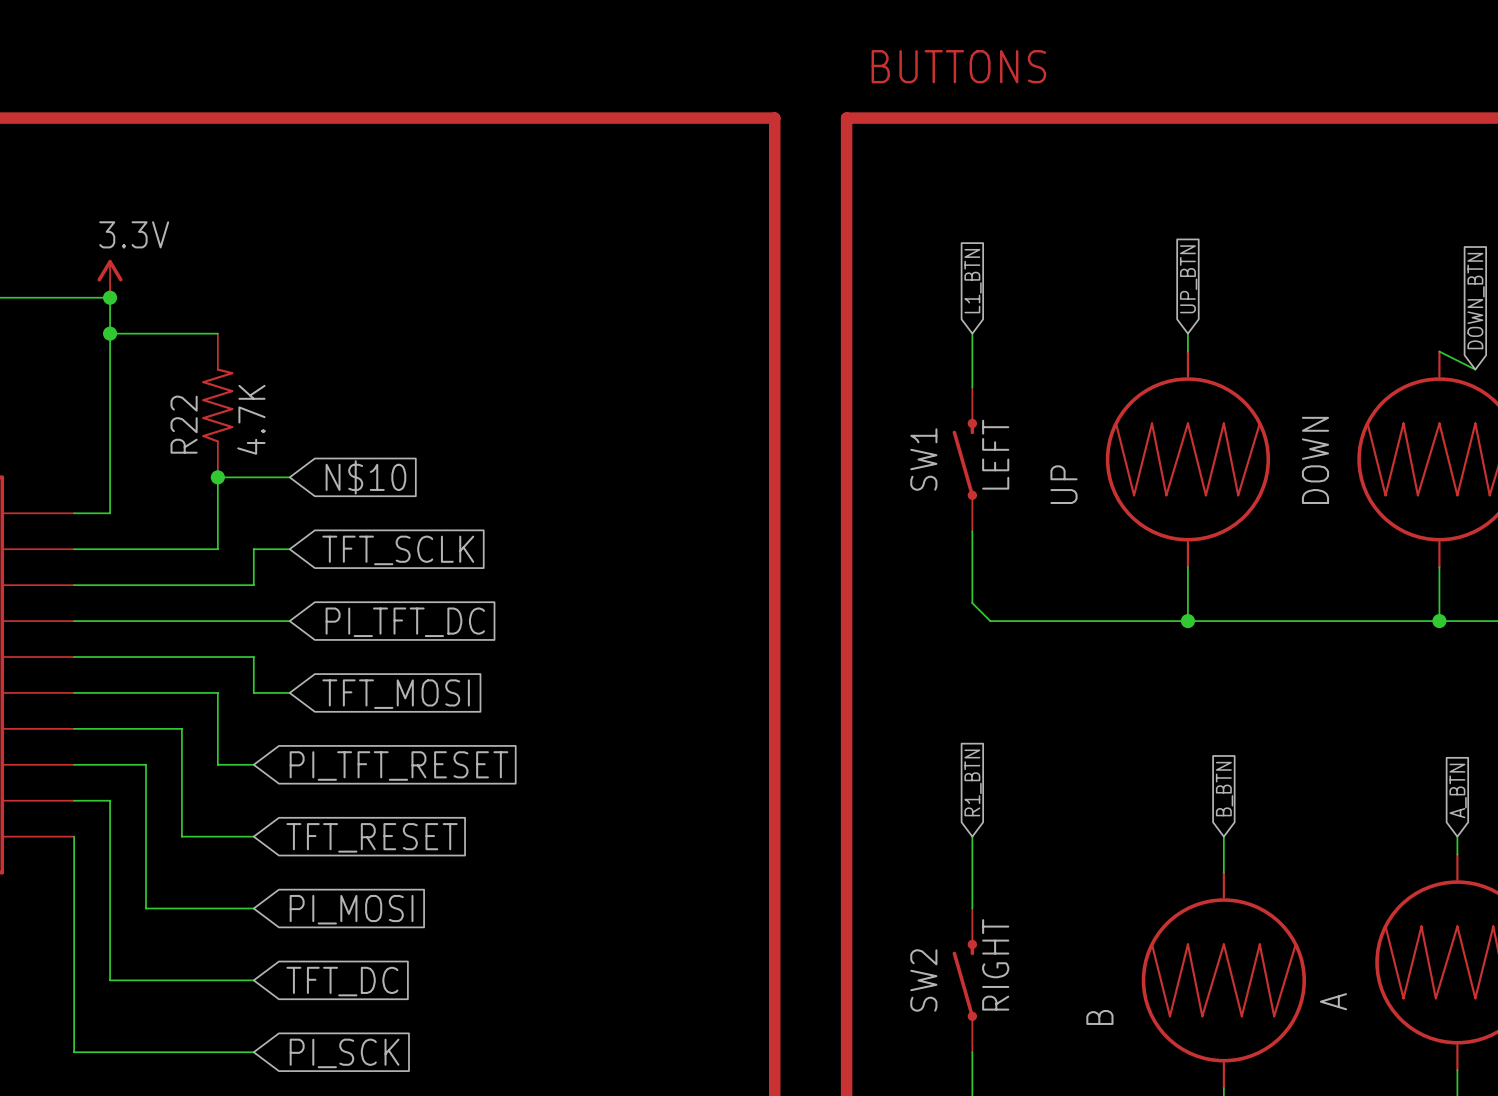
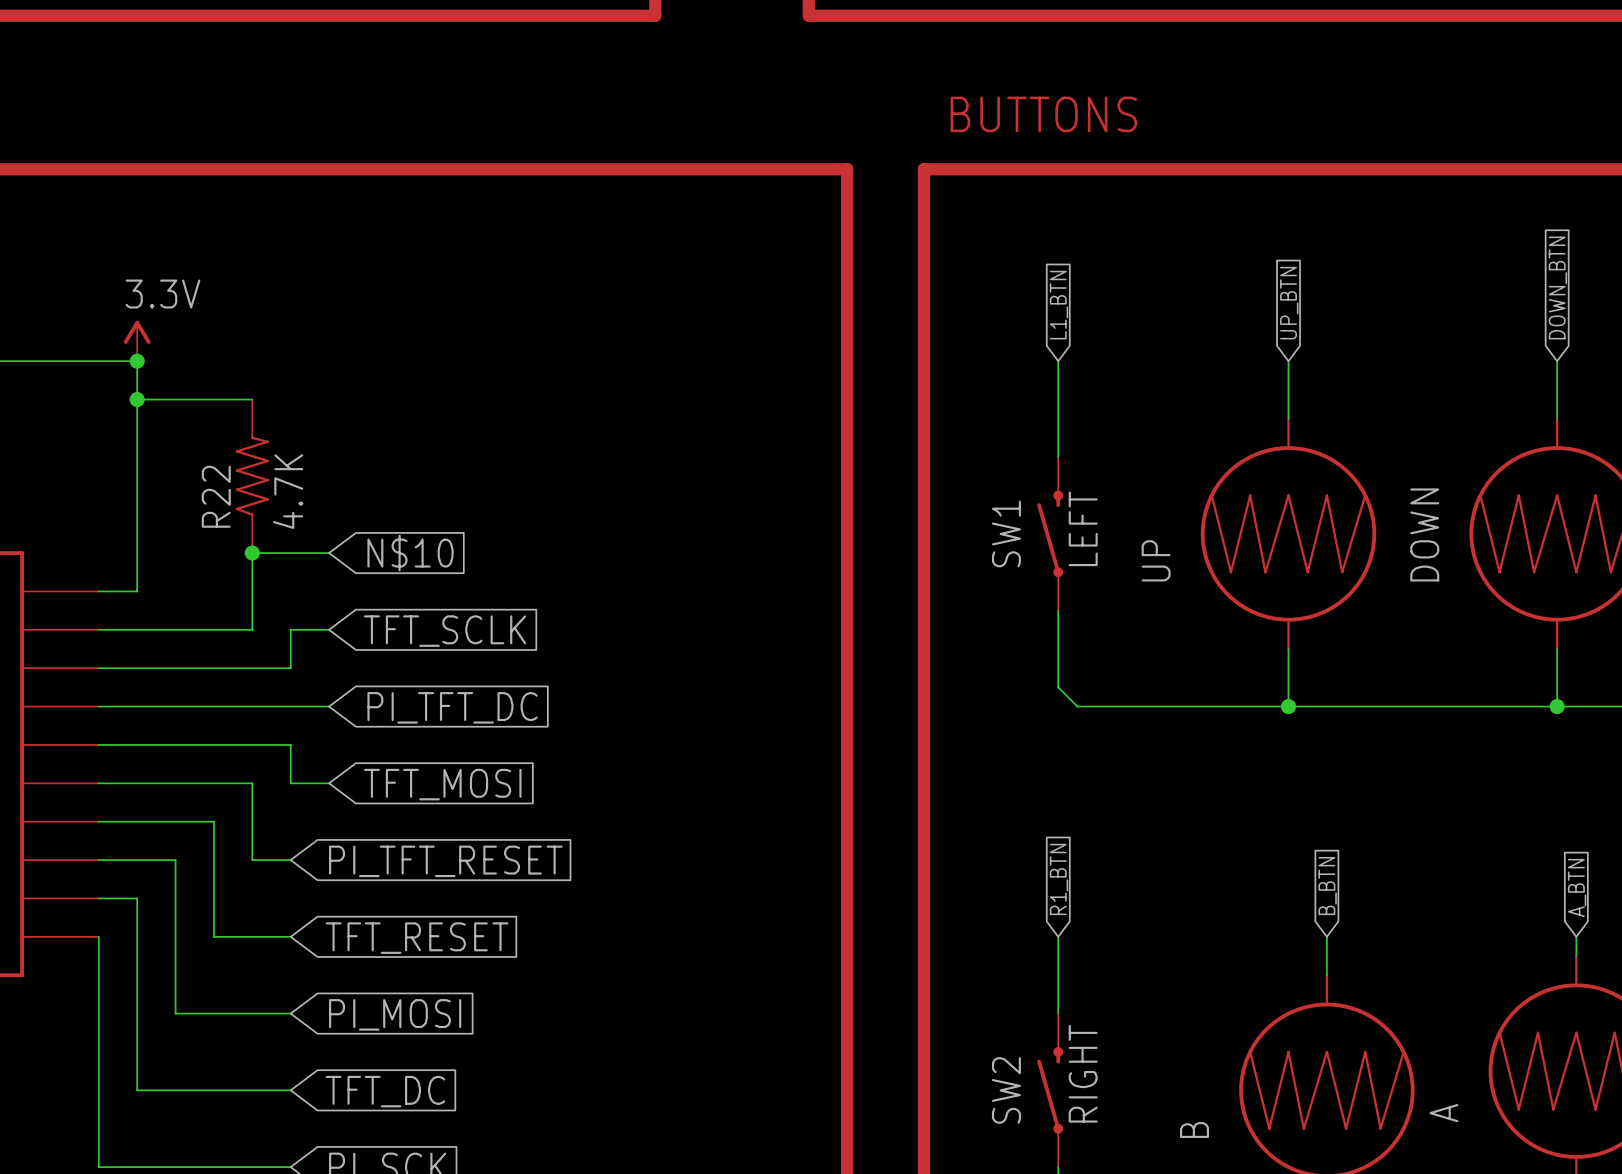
global label position: UP_BTN (1188, 279) -> UP_BTN (1289, 303)
global label position: L1_BTN (973, 281) -> L1_BTN (1058, 305)
wire: none -> (1058, 361) (1058, 399)
wire: none -> (1288, 361) (1288, 399)
global label position: DOWN_BTN (1476, 301) -> DOWN_BTN (1557, 287)
wire: (1439, 351) (1475, 369) -> (1557, 418) (1557, 361)

